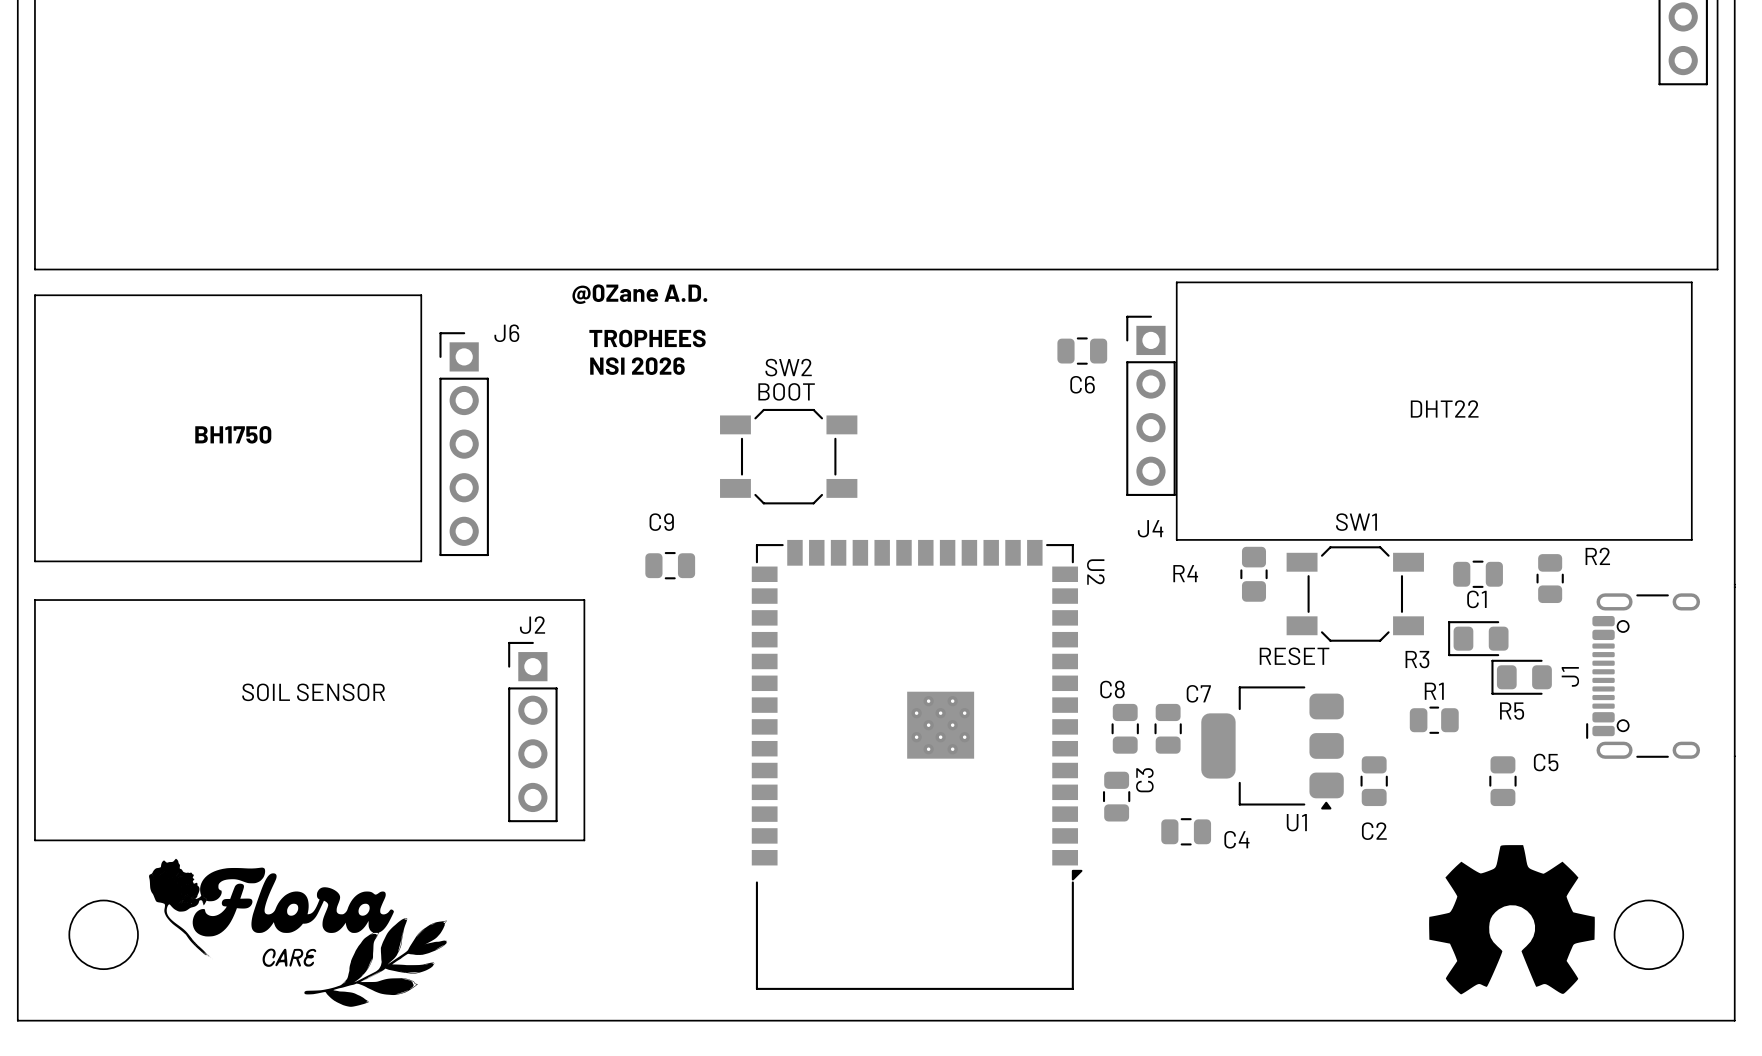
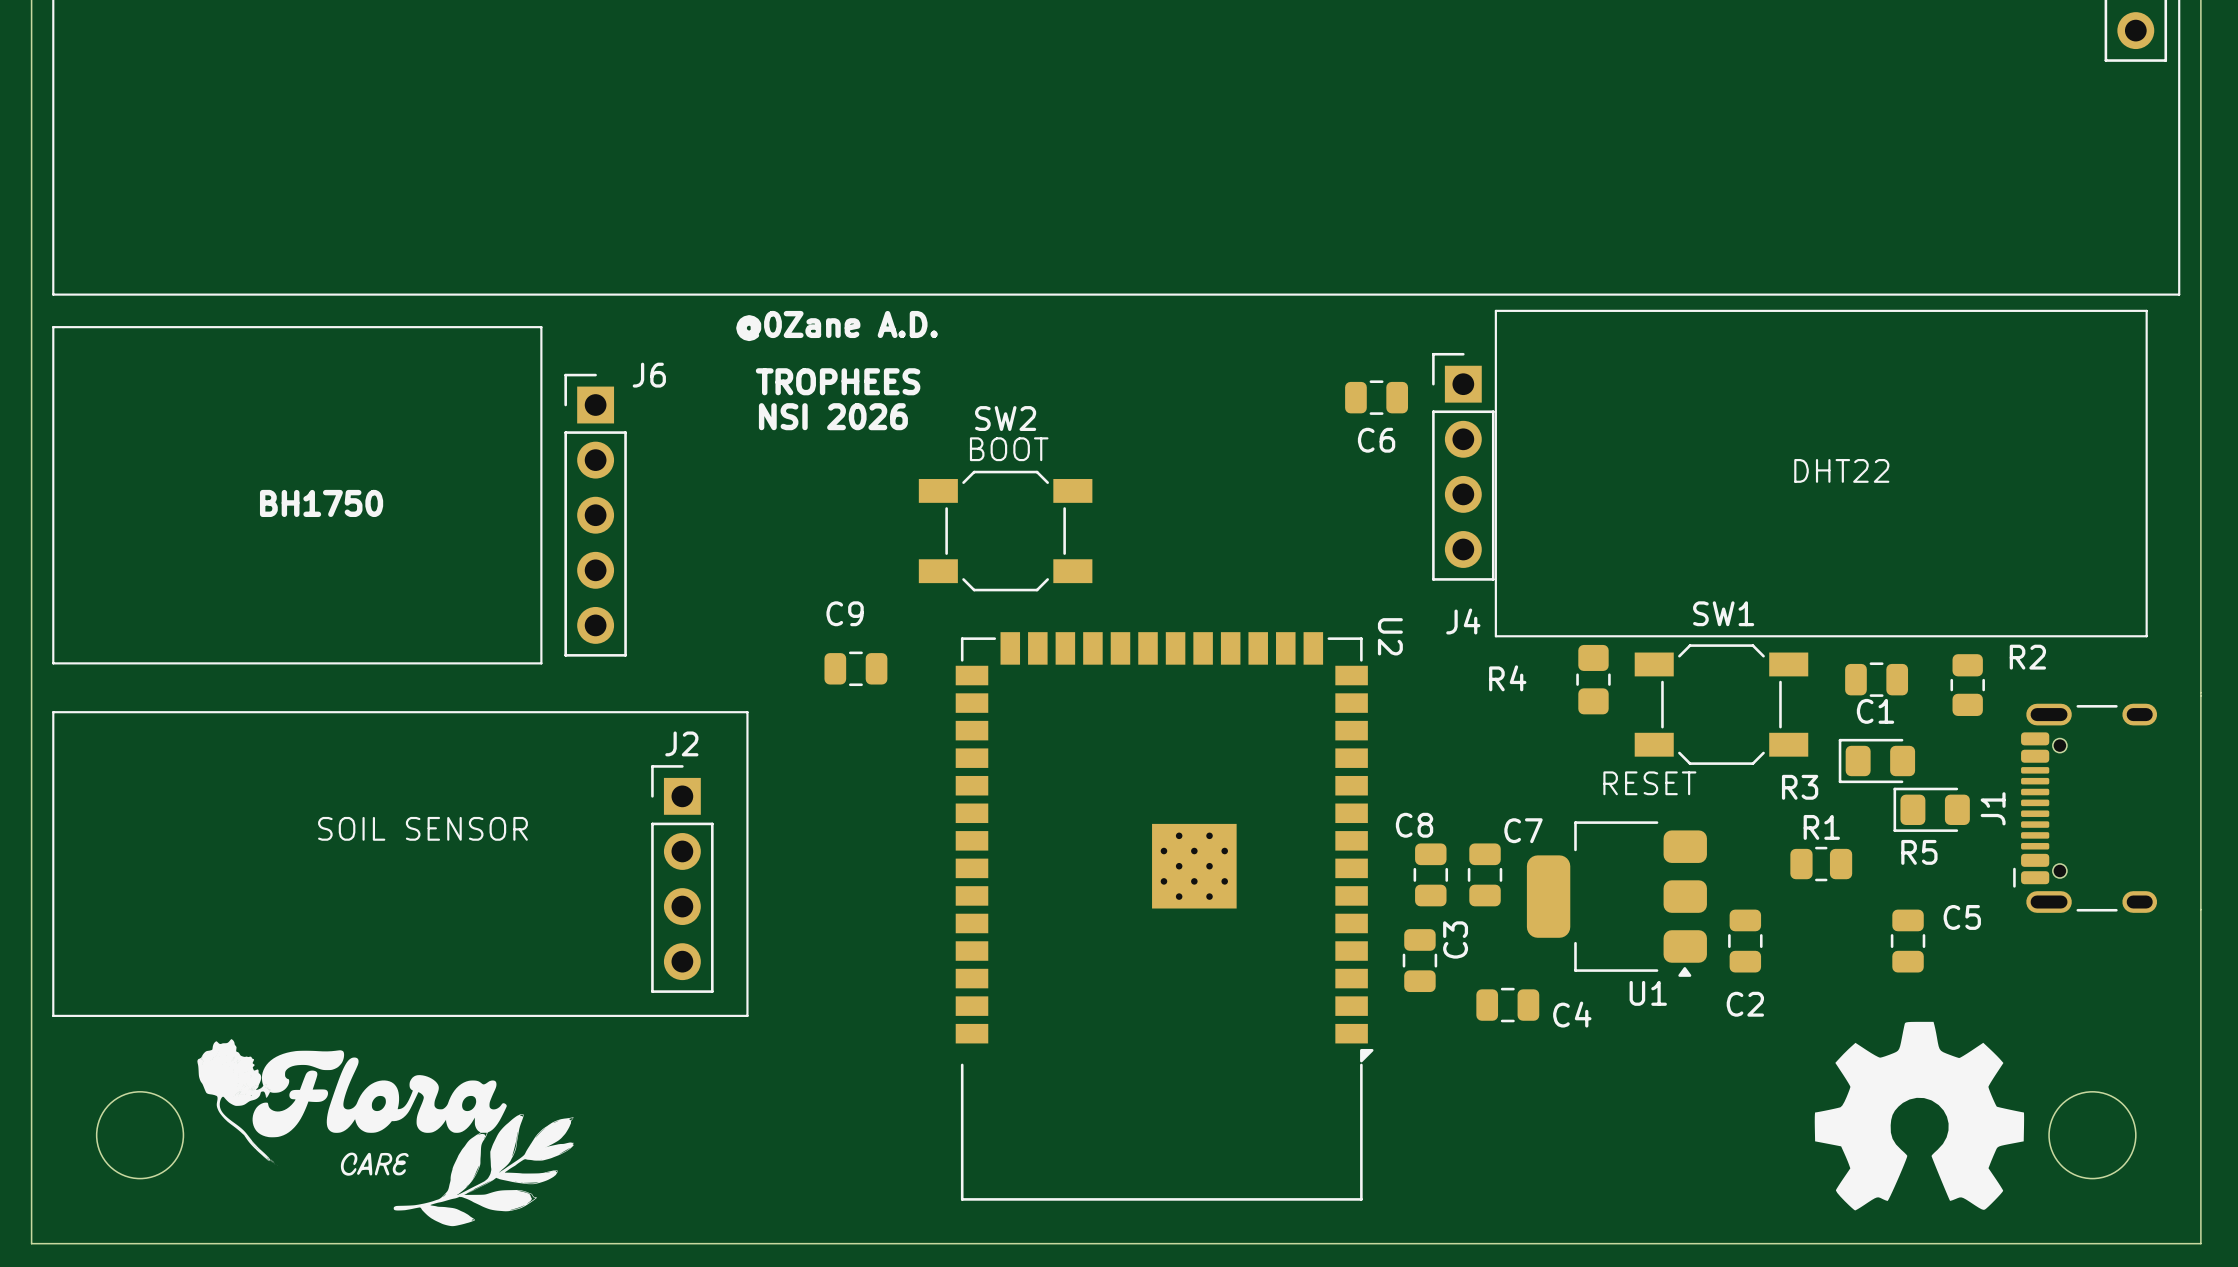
U2 footprint: [751, 539, 1083, 990] -> [955, 632, 1374, 1201]
U2 name position: U2 (1095, 572) -> U2 (1390, 636)

